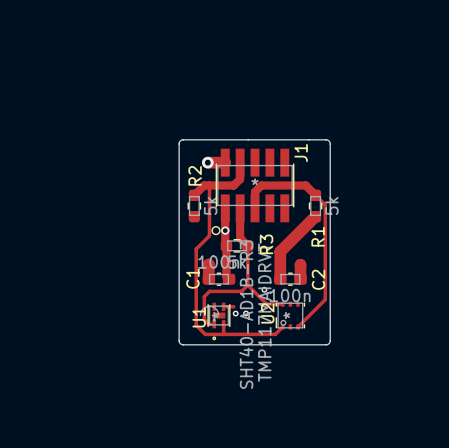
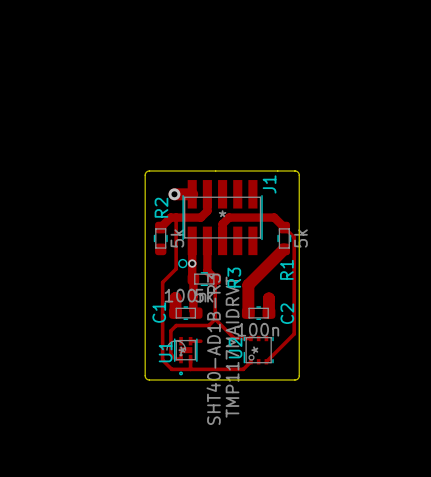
via: (264, 289) -> none
via: (235, 313) -> none
via: (246, 313) -> none

